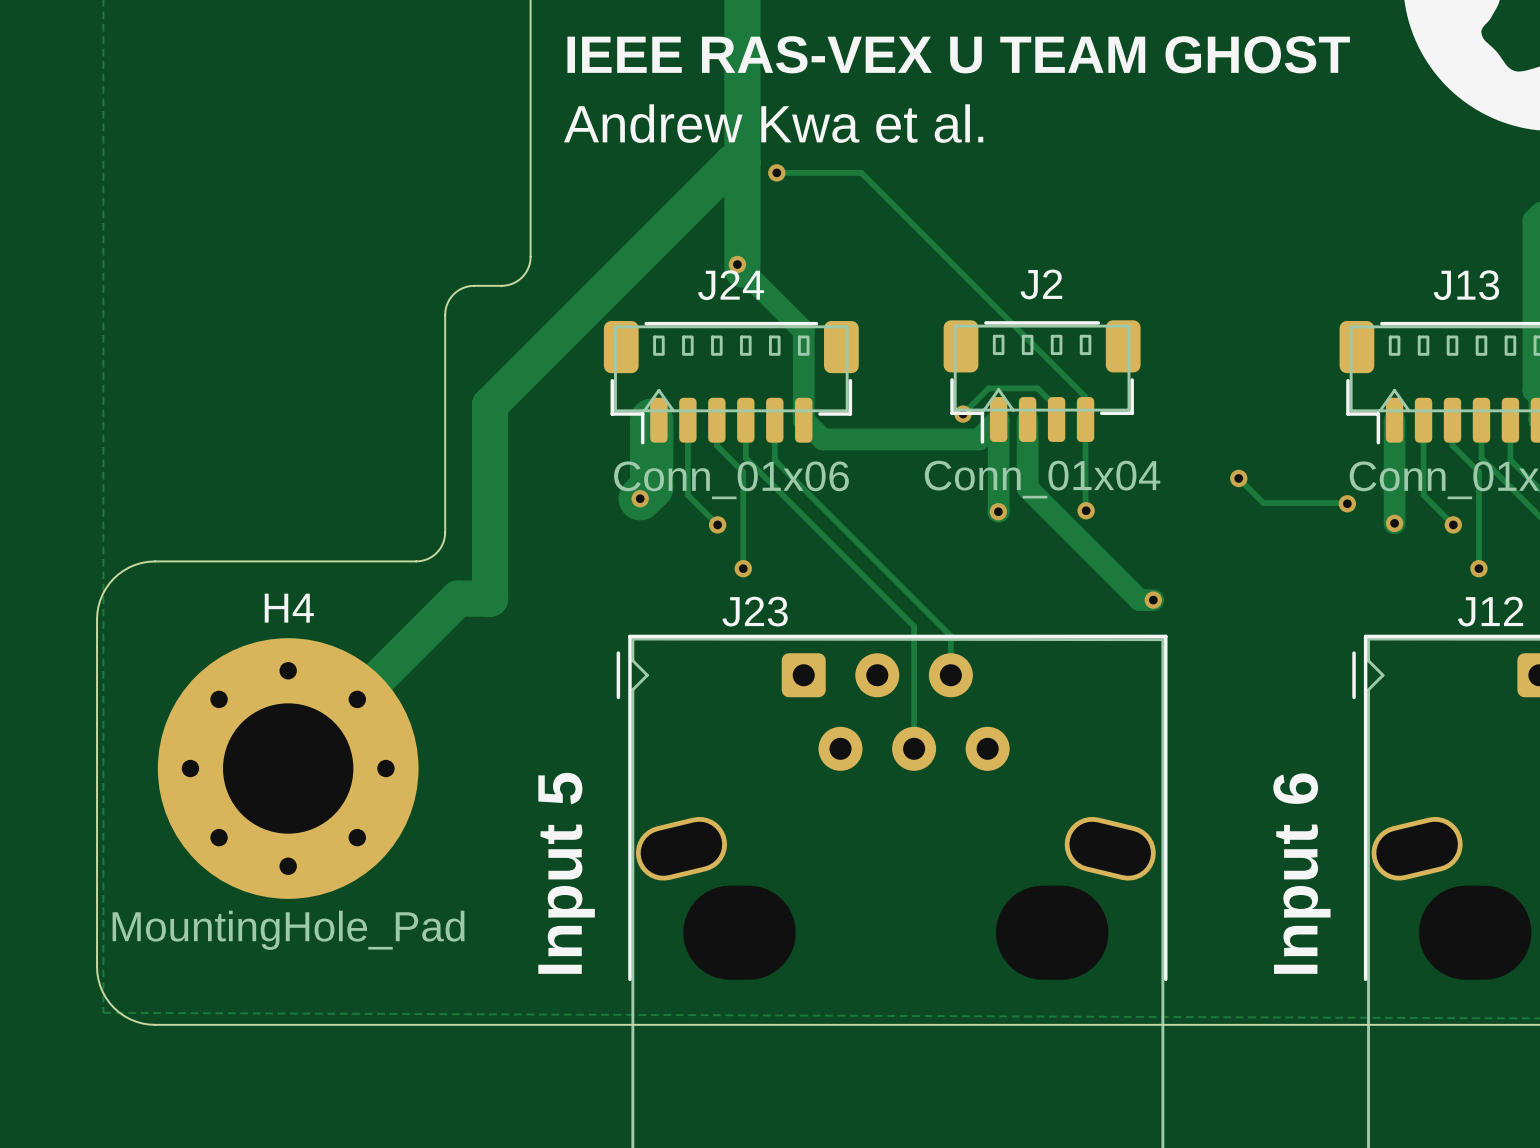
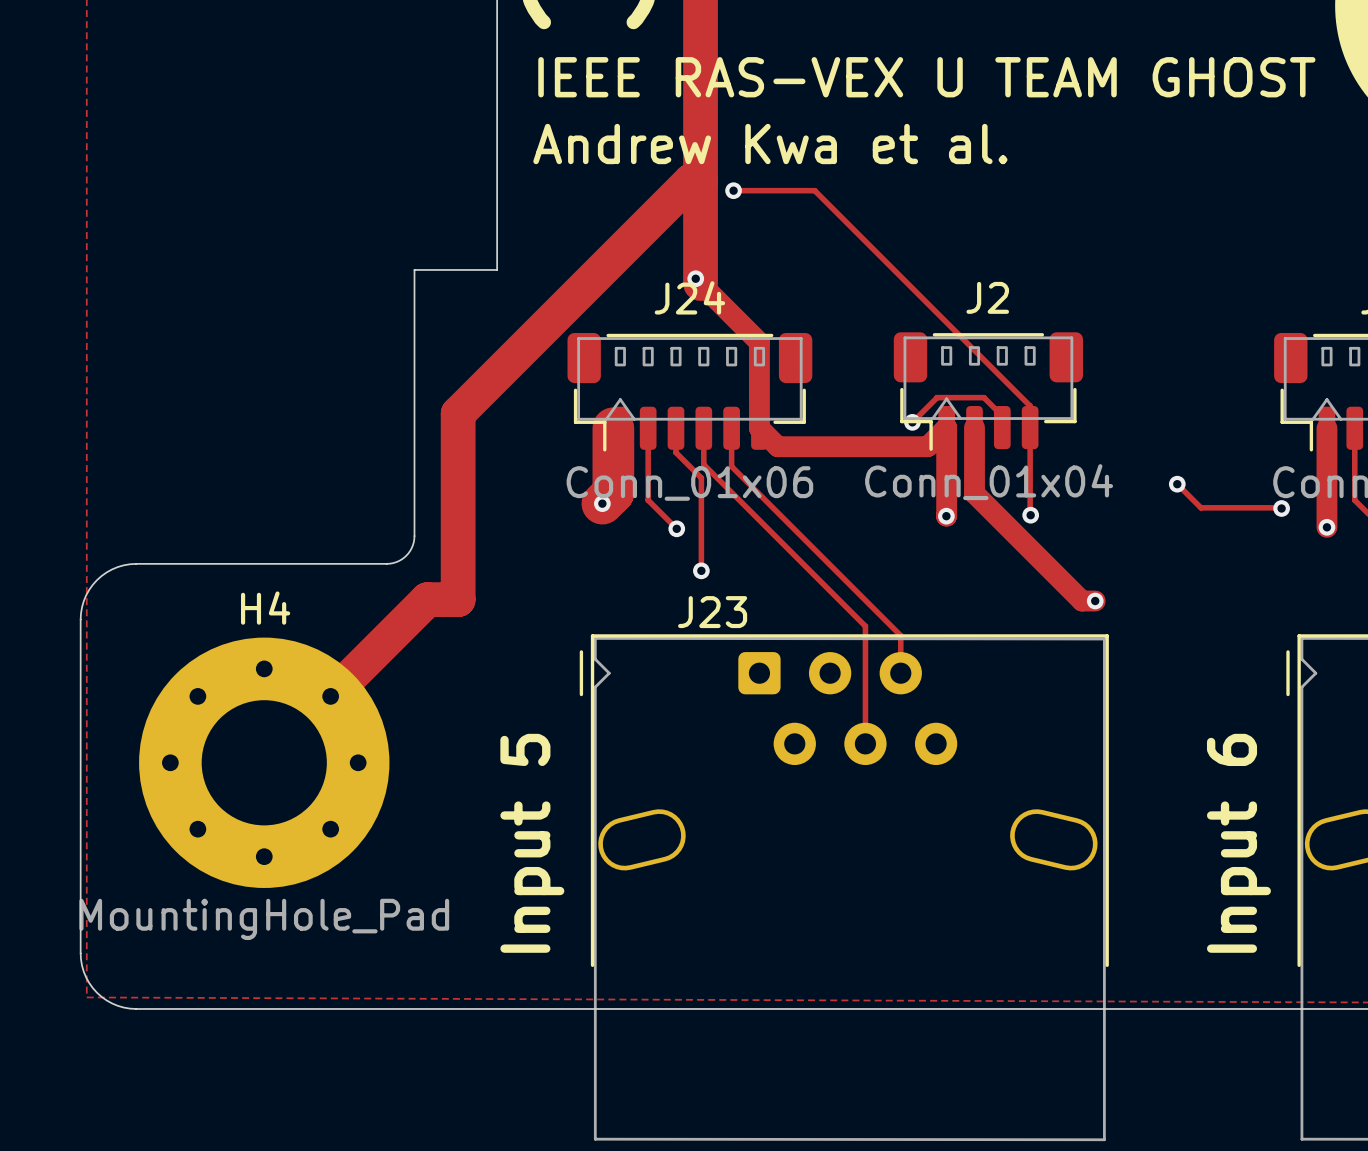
board edge: (530, 255) (527, 269) (517, 281) (504, 285) (464, 287) (453, 294) (446, 305) (445, 314) (444, 535) (440, 547) (434, 555) (425, 559) (416, 561) -> (497, 269) (414, 269) (414, 539) (411, 548) (406, 555) (398, 561) (386, 563)

